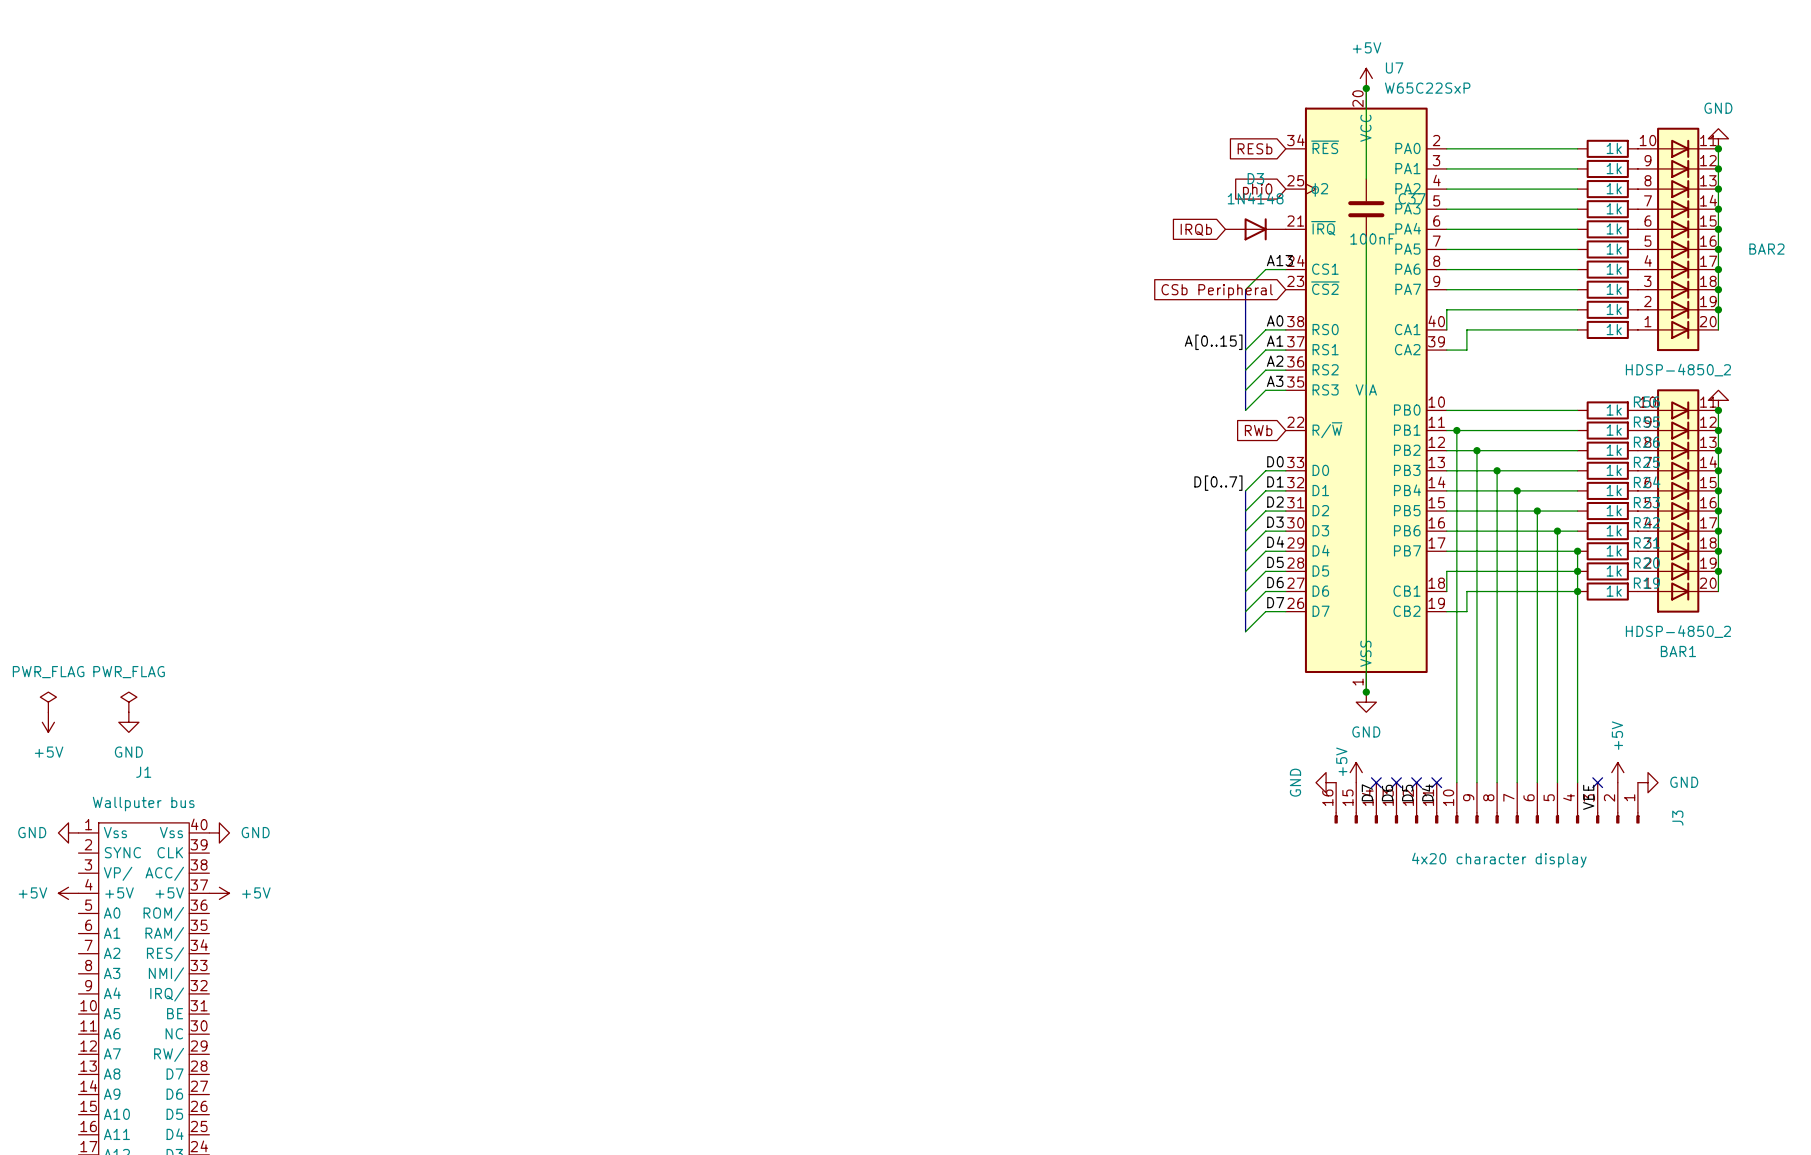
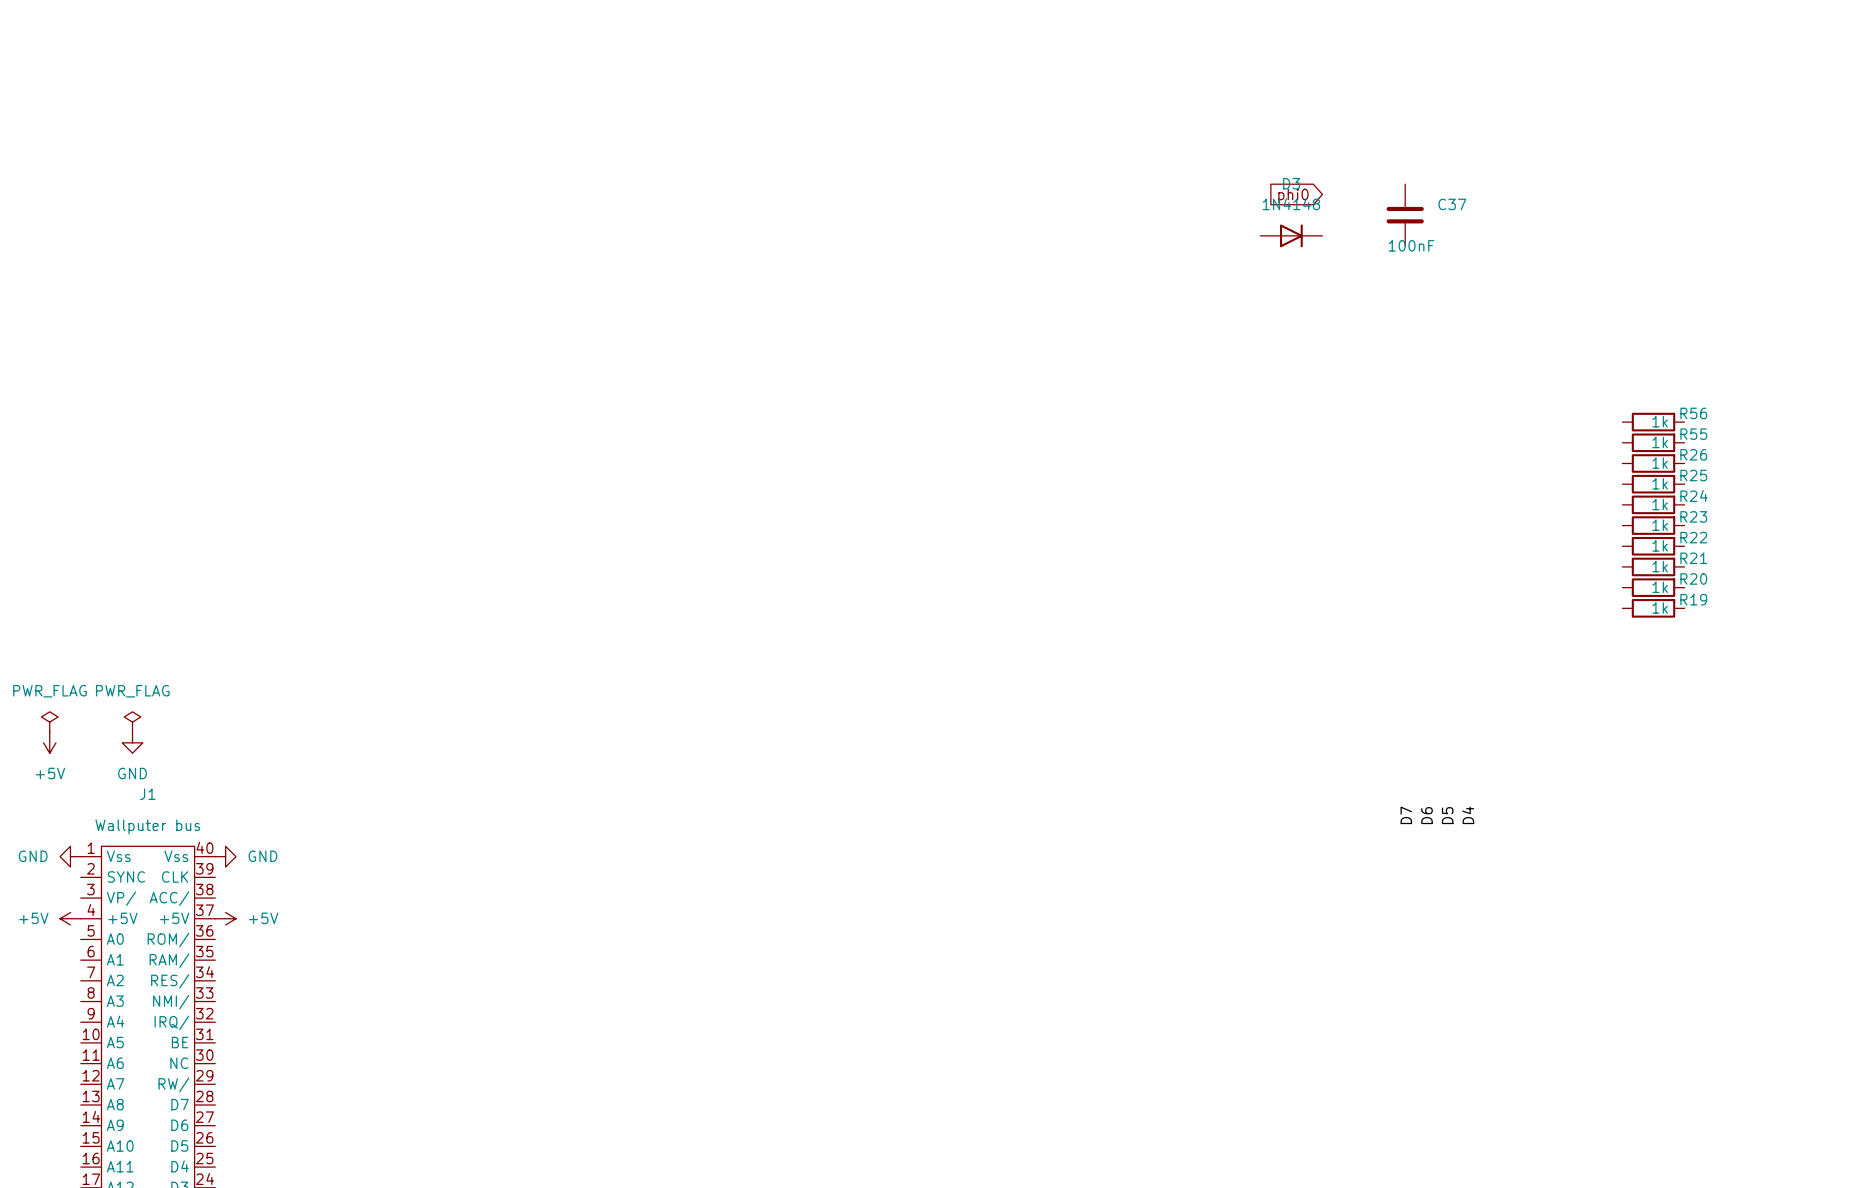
power symbol: +5V (1366, 78) -> none
wire: (1366, 88) (1366, 179) -> none
junction: (1366, 88) -> none
power symbol: GND (1718, 138) -> none
global label: RESb (1255, 148) -> none
wire: (1446, 148) (1577, 148) -> none
part: 1k (1607, 148) -> none
wire: (1718, 148) (1718, 329) -> none
junction: (1718, 148) -> none
wire: (1446, 168) (1577, 168) -> none
part: 1k (1607, 168) -> none
junction: (1718, 168) -> none
wire: (1446, 189) (1577, 189) -> none
part: 1k (1607, 189) -> none
junction: (1718, 189) -> none
wire: (1446, 209) (1577, 209) -> none
part: 1k (1607, 209) -> none
junction: (1718, 209) -> none
global label: IRQb (1196, 229) -> none
wire: (1446, 229) (1577, 229) -> none
part: 1k (1607, 229) -> none
junction: (1718, 229) -> none
wire: (1366, 239) (1366, 692) -> none
BAR2: HDSP-4850_2 (1678, 239) -> none
wire: (1446, 249) (1577, 249) -> none
part: 1k (1607, 249) -> none
junction: (1718, 249) -> none
label: A13 (1279, 260) -> none
wire: (1285, 269) (1265, 269) (1245, 289) -> none
wire: (1446, 269) (1577, 269) -> none
part: 1k (1607, 269) -> none
junction: (1718, 269) -> none
bus: (1245, 289) (1245, 410) -> none
wire: (1446, 289) (1577, 289) -> none
part: 1k (1607, 289) -> none
junction: (1718, 289) -> none
global label: CSb Peripheral (1217, 291) -> none
wire: (1577, 309) (1446, 309) (1446, 329) -> none
part: 1k (1607, 309) -> none
junction: (1718, 309) -> none
label: A0 (1275, 320) -> none
wire: (1285, 329) (1265, 329) (1245, 350) -> none
wire: (1577, 329) (1466, 329) (1466, 350) (1446, 350) -> none
part: 1k (1607, 329) -> none
label: A1 (1275, 341) -> none
label: A[0..15] (1213, 342) -> none
wire: (1285, 350) (1265, 350) (1245, 370) -> none
label: A2 (1275, 361) -> none
wire: (1285, 370) (1265, 370) (1245, 390) -> none
label: A3 (1275, 381) -> none
wire: (1285, 390) (1265, 390) (1245, 410) -> none
U7: W65C22SxP (1366, 390) -> none
power symbol: (1718, 400) -> none
wire: (1446, 410) (1577, 410) -> none
wire: (1718, 410) (1718, 591) -> none
junction: (1718, 410) -> none
global label: RWb (1258, 430) -> none
wire: (1446, 430) (1577, 430) -> none
wire: (1456, 430) (1456, 782) -> none
junction: (1456, 430) -> none
junction: (1718, 430) -> none
wire: (1446, 450) (1577, 450) -> none
wire: (1476, 450) (1476, 782) -> none
junction: (1476, 450) -> none
junction: (1718, 450) -> none
label: D0 (1275, 461) -> none
wire: (1285, 470) (1265, 470) (1245, 490) -> none
wire: (1446, 470) (1577, 470) -> none
wire: (1497, 470) (1497, 782) -> none
junction: (1497, 470) -> none
junction: (1718, 470) -> none
label: D1 (1275, 481) -> none
label: D[0..7] (1218, 483) -> none
bus: (1245, 490) (1245, 631) -> none
wire: (1285, 490) (1265, 490) (1245, 511) -> none
wire: (1446, 490) (1577, 490) -> none
wire: (1517, 490) (1517, 782) -> none
junction: (1517, 490) -> none
junction: (1718, 490) -> none
BAR1: HDSP-4850_2 (1678, 500) -> none
label: D2 (1275, 502) -> none
wire: (1285, 511) (1265, 511) (1245, 531) -> none
wire: (1446, 511) (1577, 511) -> none
wire: (1537, 511) (1537, 782) -> none
junction: (1537, 511) -> none
junction: (1718, 511) -> none
label: D3 (1275, 522) -> none
wire: (1285, 531) (1265, 531) (1245, 551) -> none
wire: (1446, 531) (1577, 531) -> none
wire: (1557, 531) (1557, 782) -> none
junction: (1557, 531) -> none
junction: (1718, 531) -> none
label: D4 (1275, 542) -> none
wire: (1285, 551) (1265, 551) (1245, 571) -> none
wire: (1446, 551) (1577, 551) (1577, 782) -> none
junction: (1577, 551) -> none
junction: (1718, 551) -> none
label: D5 (1275, 562) -> none
wire: (1285, 571) (1265, 571) (1245, 591) -> none
wire: (1577, 571) (1446, 571) (1446, 591) -> none
junction: (1577, 571) -> none
junction: (1718, 571) -> none
label: D6 (1275, 582) -> none
wire: (1285, 591) (1265, 591) (1245, 611) -> none
wire: (1577, 591) (1466, 591) (1466, 611) (1446, 611) -> none
junction: (1577, 591) -> none
label: D7 (1275, 602) -> none
wire: (1285, 611) (1265, 611) (1245, 631) -> none
junction: (1366, 692) -> none
power symbol: GND (1366, 702) -> none
power symbol: +5V (1356, 772) -> none
power symbol: +5V (1617, 772) -> none
power symbol: GND (1326, 782) -> none
no-connect mark: (1376, 782) -> none
no-connect mark: (1396, 782) -> none
no-connect mark: (1416, 782) -> none
no-connect mark: (1436, 782) -> none
no-connect mark: (1597, 782) -> none
power symbol: GND (1648, 782) -> none
label: VEE (1588, 797) -> none
J3: 4x20 character display (1487, 803) -> none

